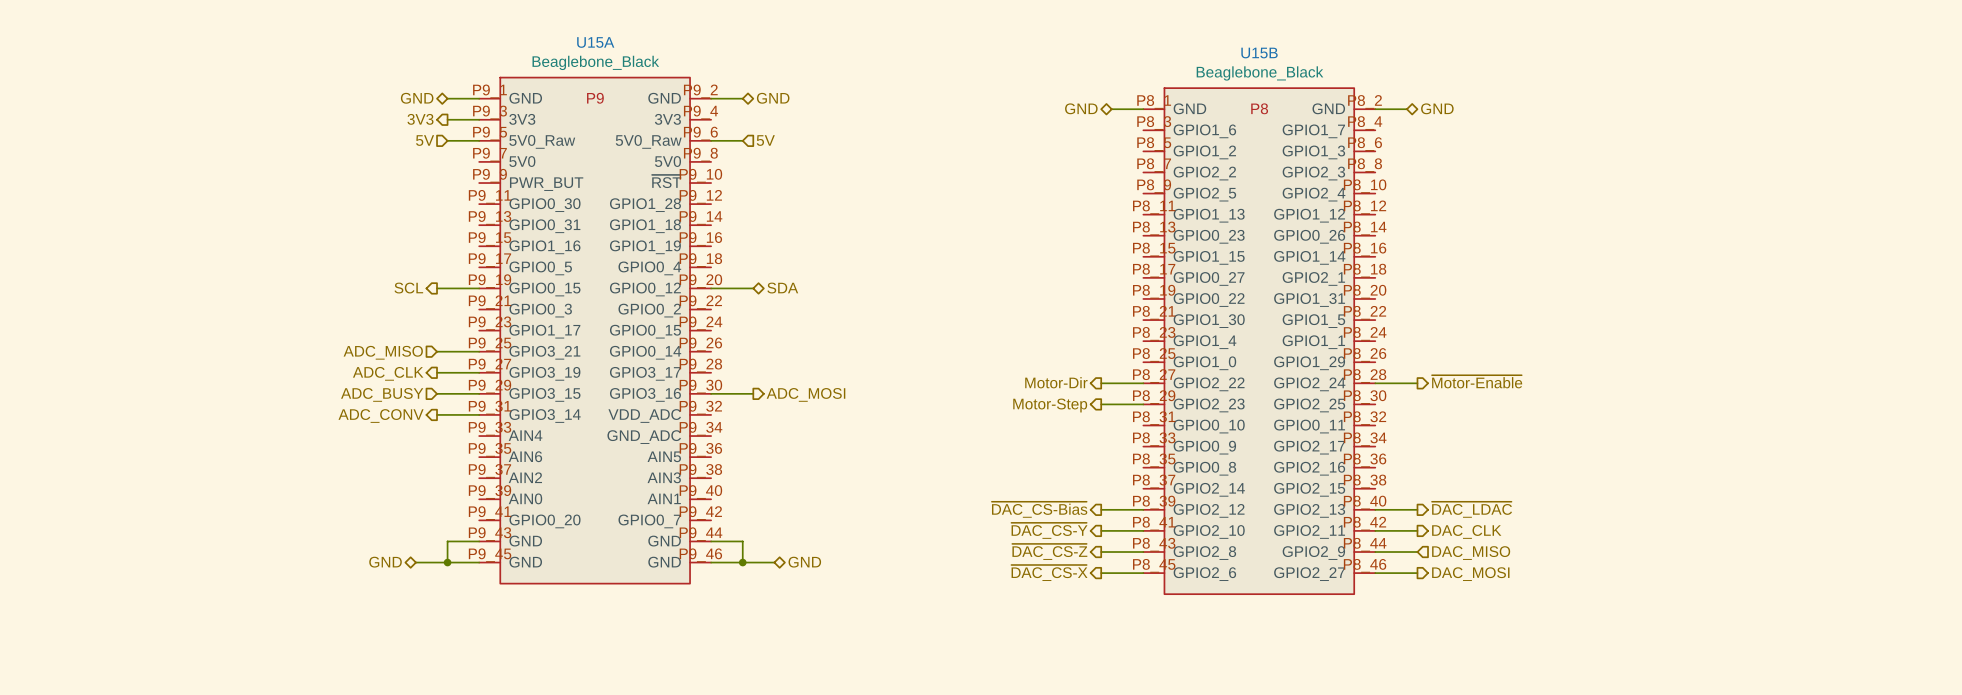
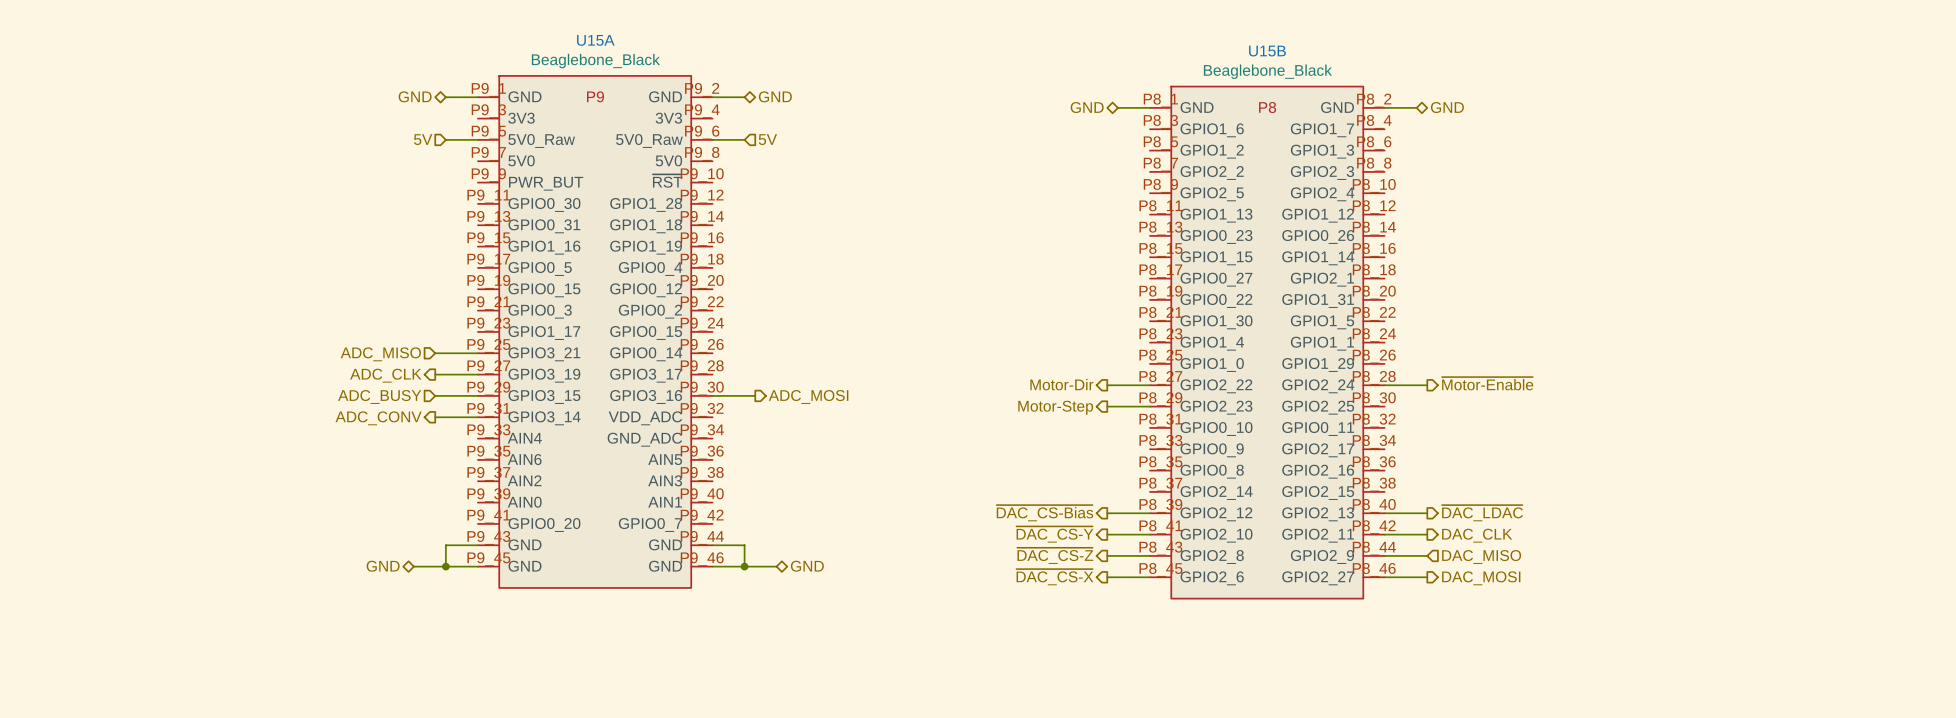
hierarchical label: 3V3 (420, 119) -> none
wire: (447, 119) (479, 119) -> none
hierarchical label: SCL (408, 288) -> none
wire: (437, 288) (479, 288) -> none
wire: (711, 288) (753, 288) -> none
hierarchical label: SDA (782, 288) -> none

